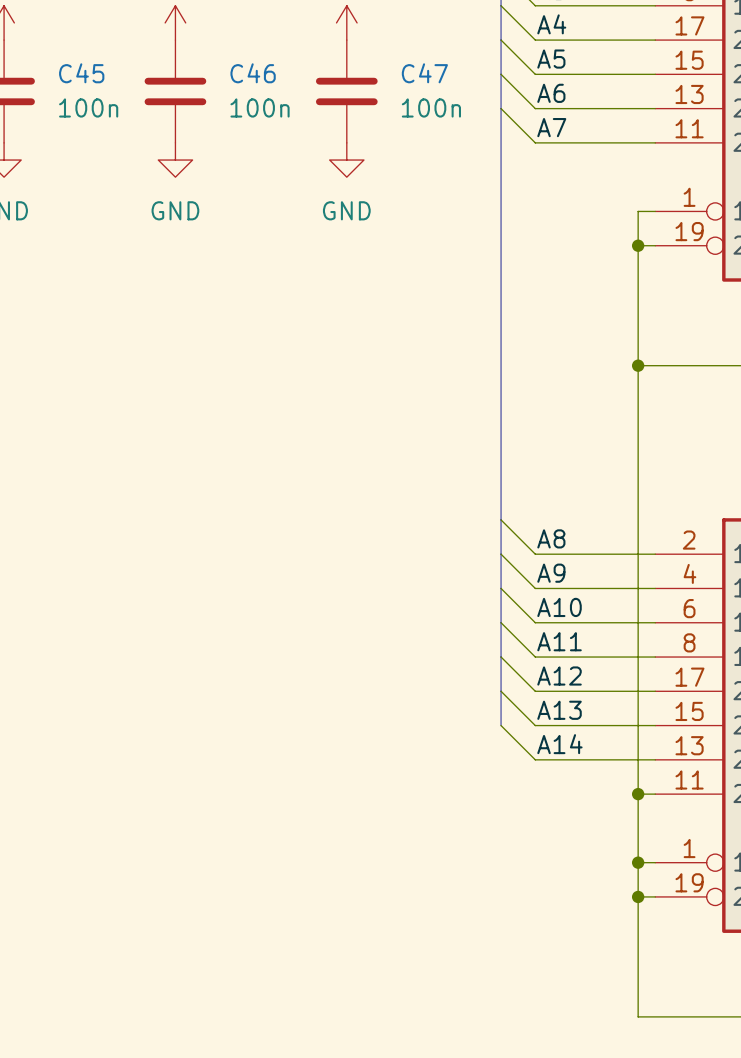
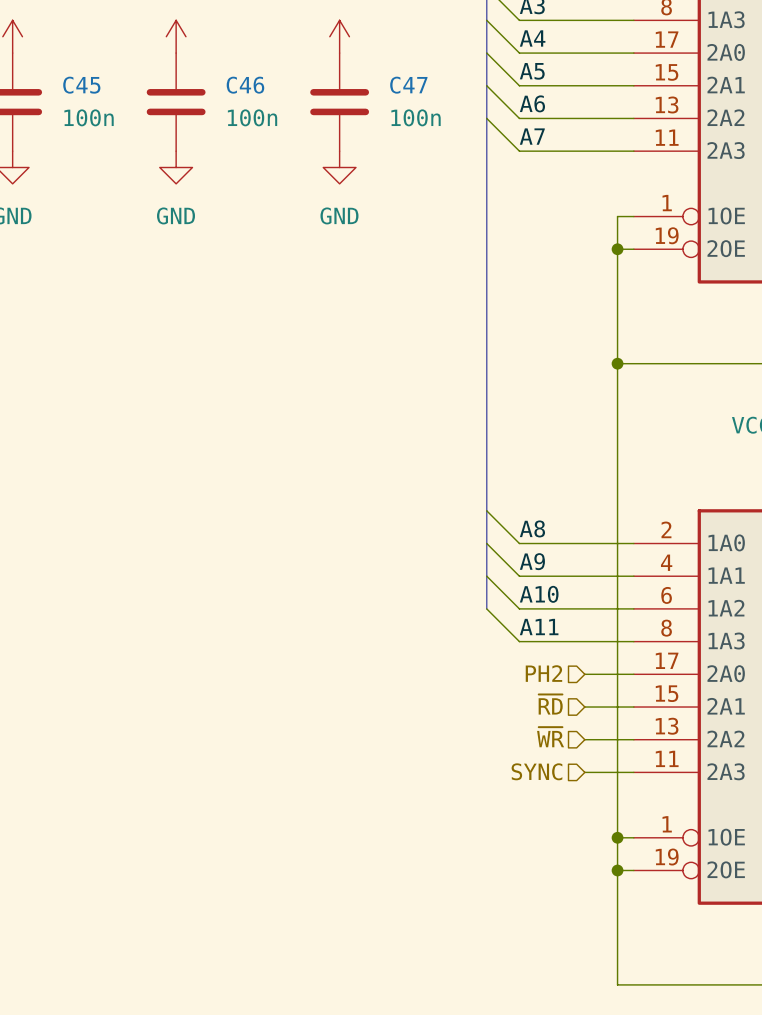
bus: (501, 622) (501, 725) -> none
wire: (501, 657) (535, 691) (603, 691) -> none
label: A12 (559, 676) -> none
hierarchical label: none -> PH2 (543, 673)
wire: (501, 691) (535, 725) (603, 725) -> none
label: A13 (559, 710) -> none
hierarchical label: none -> ~{RD} (550, 704)
wire: (501, 725) (535, 759) (603, 759) -> none
label: A14 (559, 744) -> none
hierarchical label: none -> ~{WR} (550, 737)
hierarchical label: none -> SYNC (536, 771)
wire: none -> (584, 772) (617, 772)
junction: (638, 794) -> none

